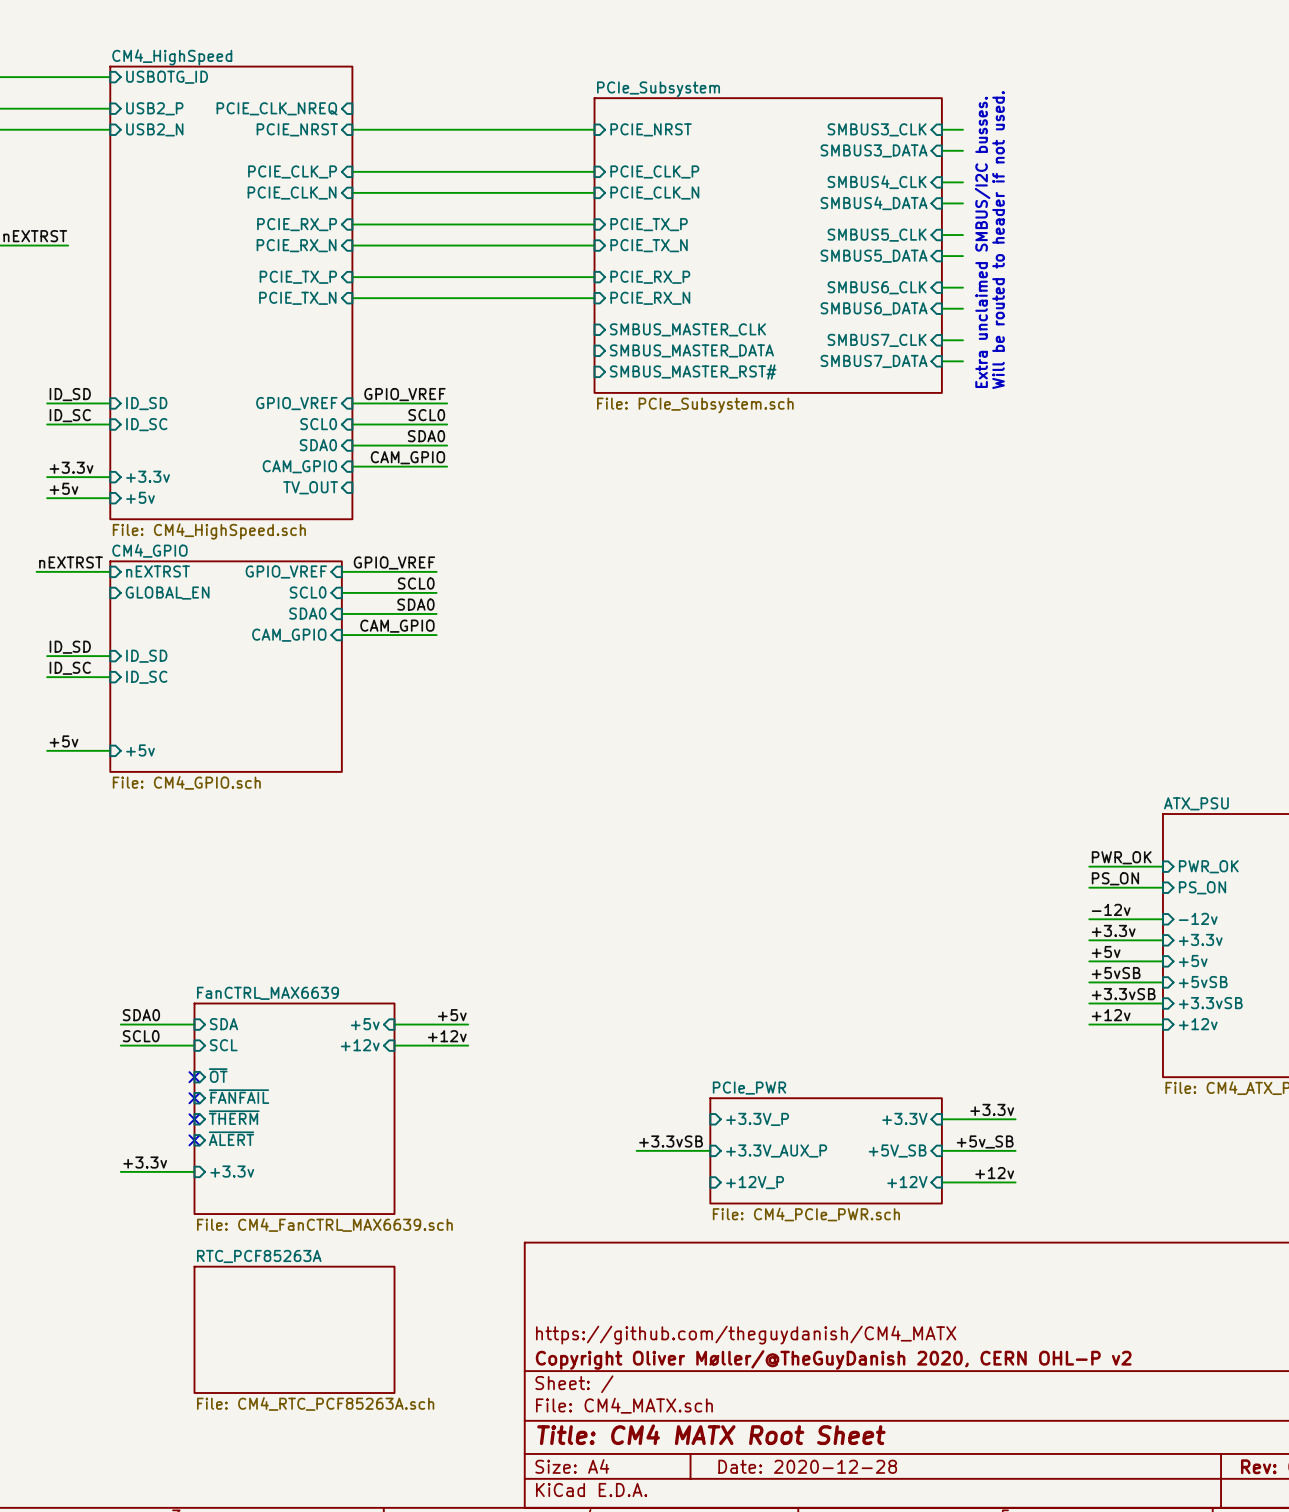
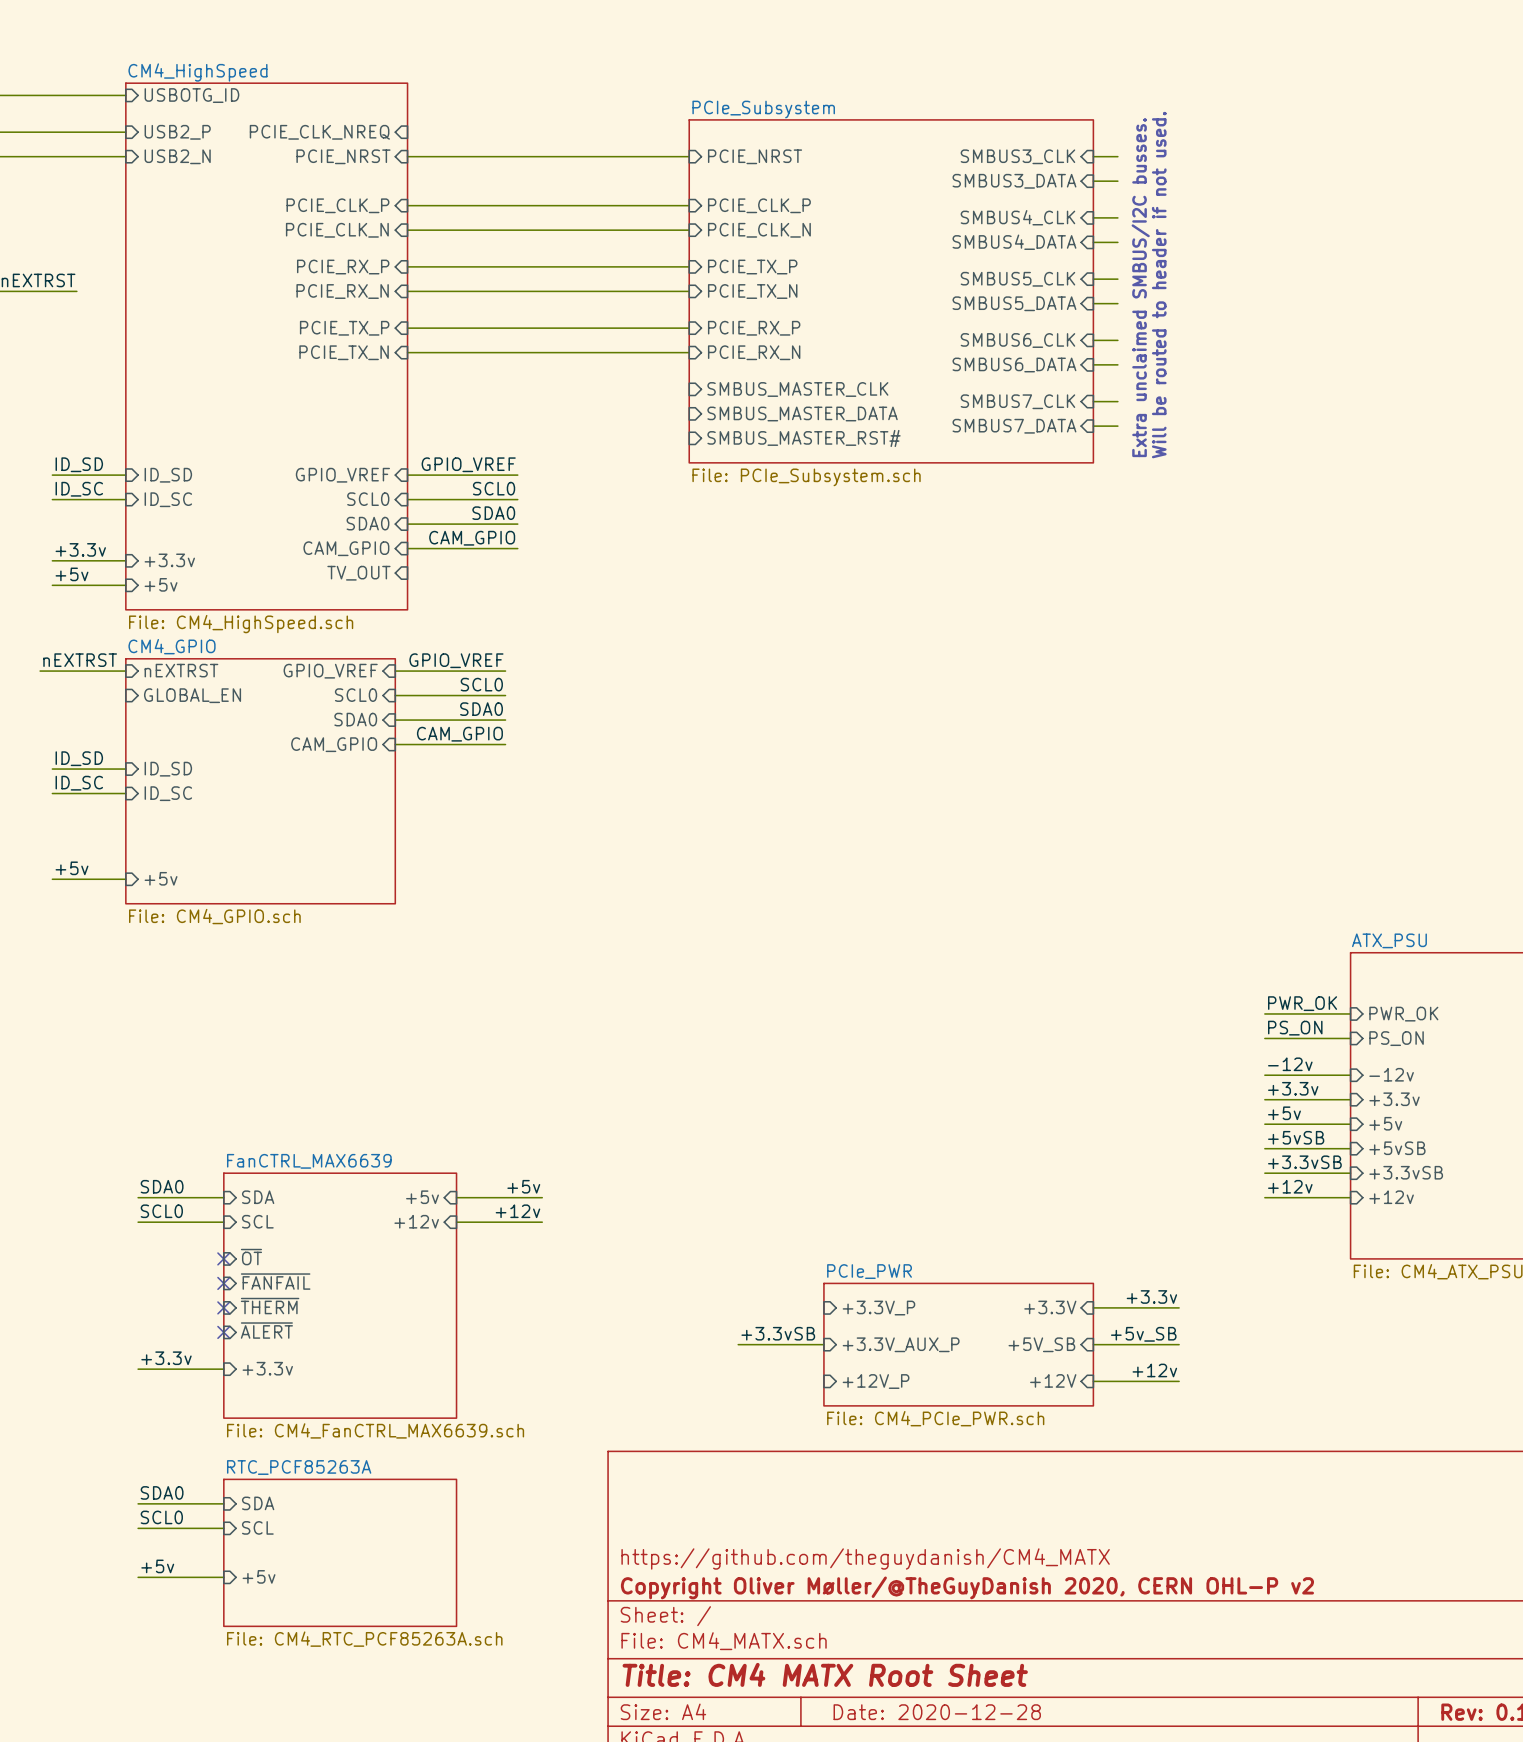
label: none -> SDA0 (162, 1492)
wire: none -> (138, 1503) (223, 1503)
sheet pin: none -> SDA (258, 1503)
label: none -> SCL0 (161, 1517)
wire: none -> (138, 1528) (223, 1528)
sheet pin: none -> SCL (257, 1527)
label: none -> +5v (157, 1566)
wire: none -> (138, 1577) (223, 1577)
sheet pin: none -> +5v (259, 1576)

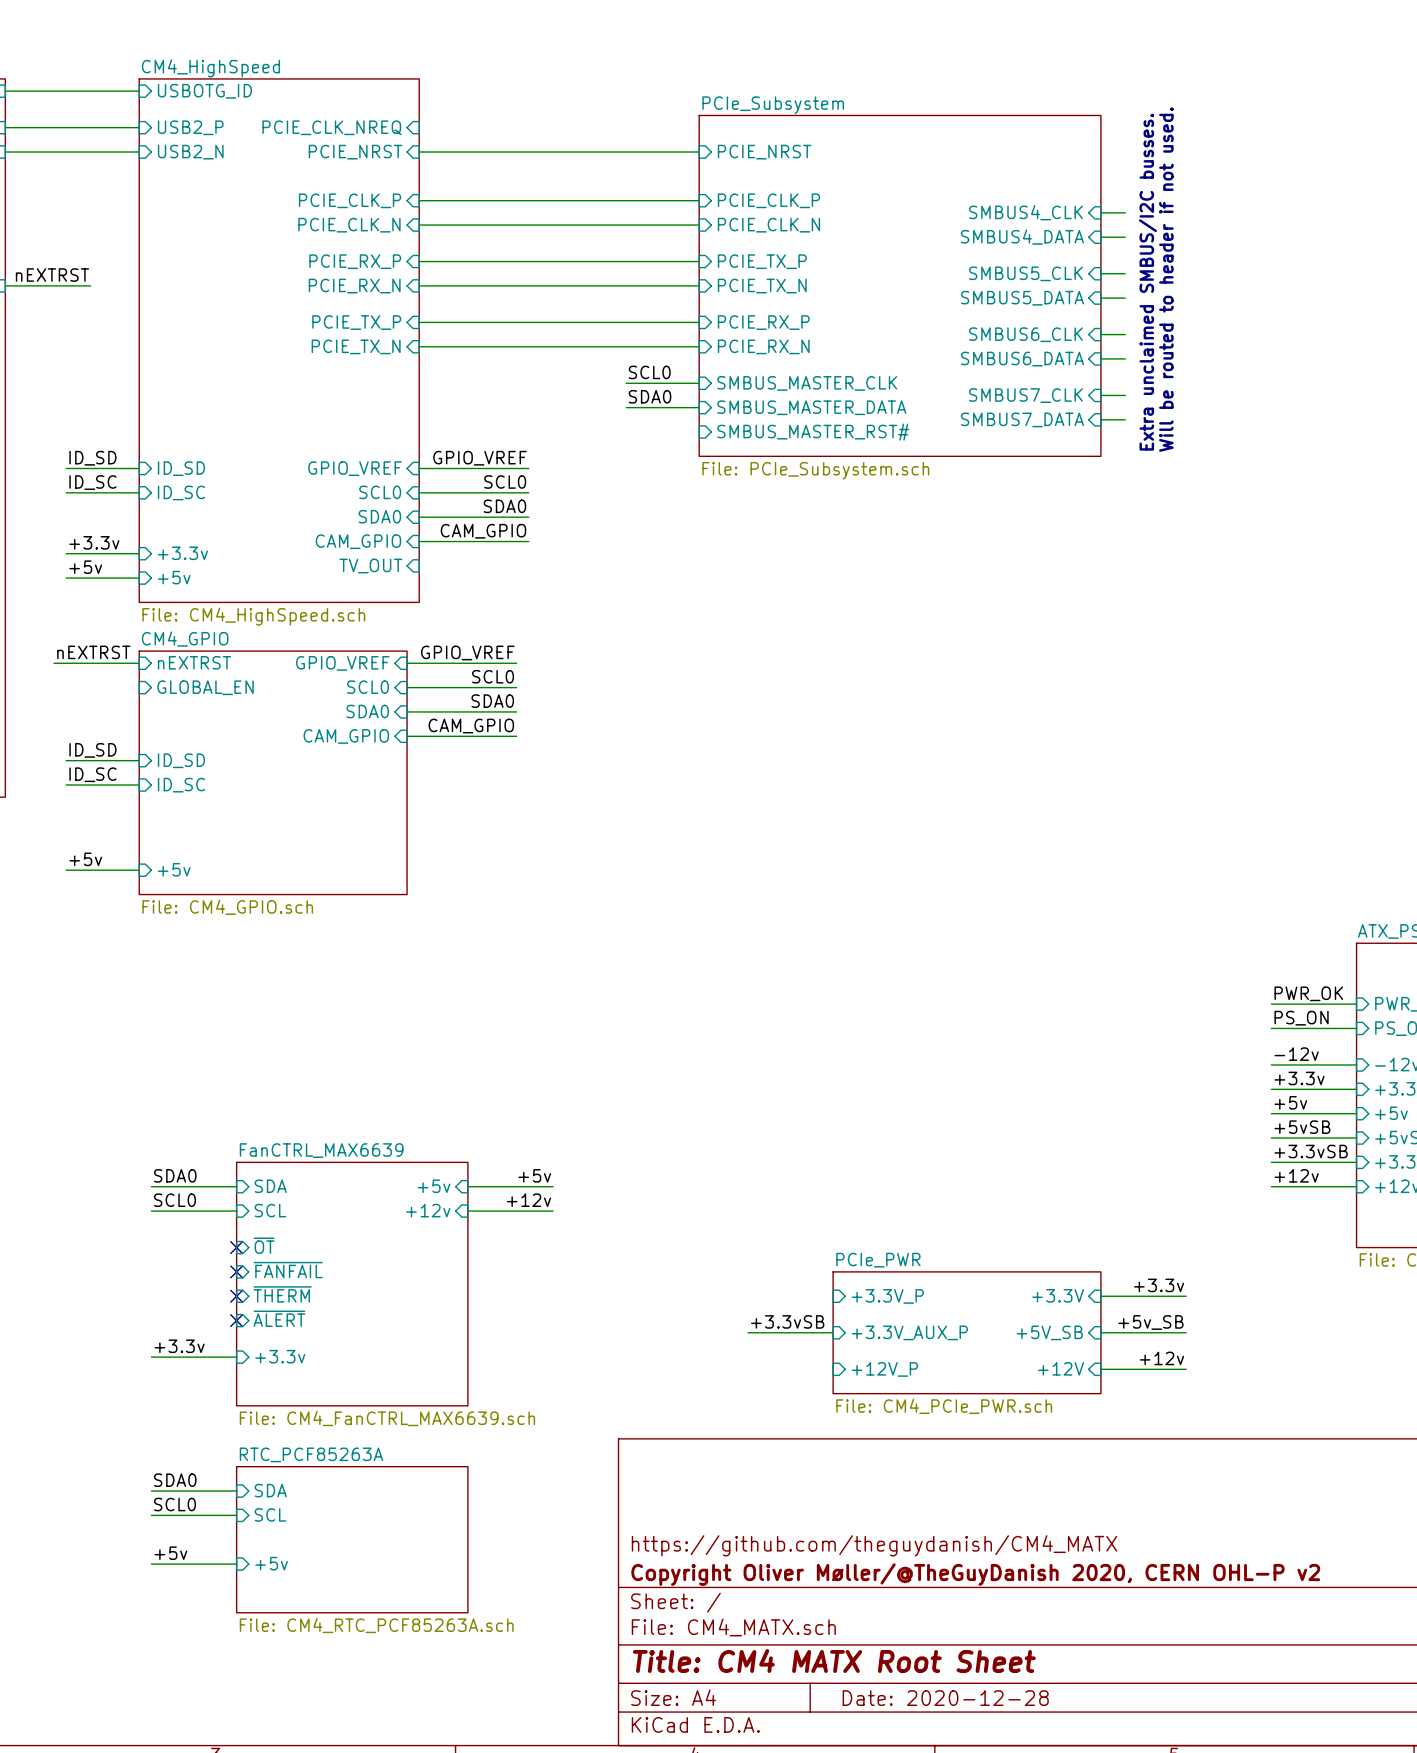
sheet pin: SMBUS3_CLK (1017, 156) -> none
wire: (1093, 156) (1117, 156) -> none
sheet pin: SMBUS3_DATA (1014, 181) -> none
wire: (1093, 181) (1117, 181) -> none
label: none -> SCL0 (649, 372)
wire: none -> (626, 383) (699, 383)
label: none -> SDA0 (650, 396)
wire: none -> (626, 407) (699, 407)

